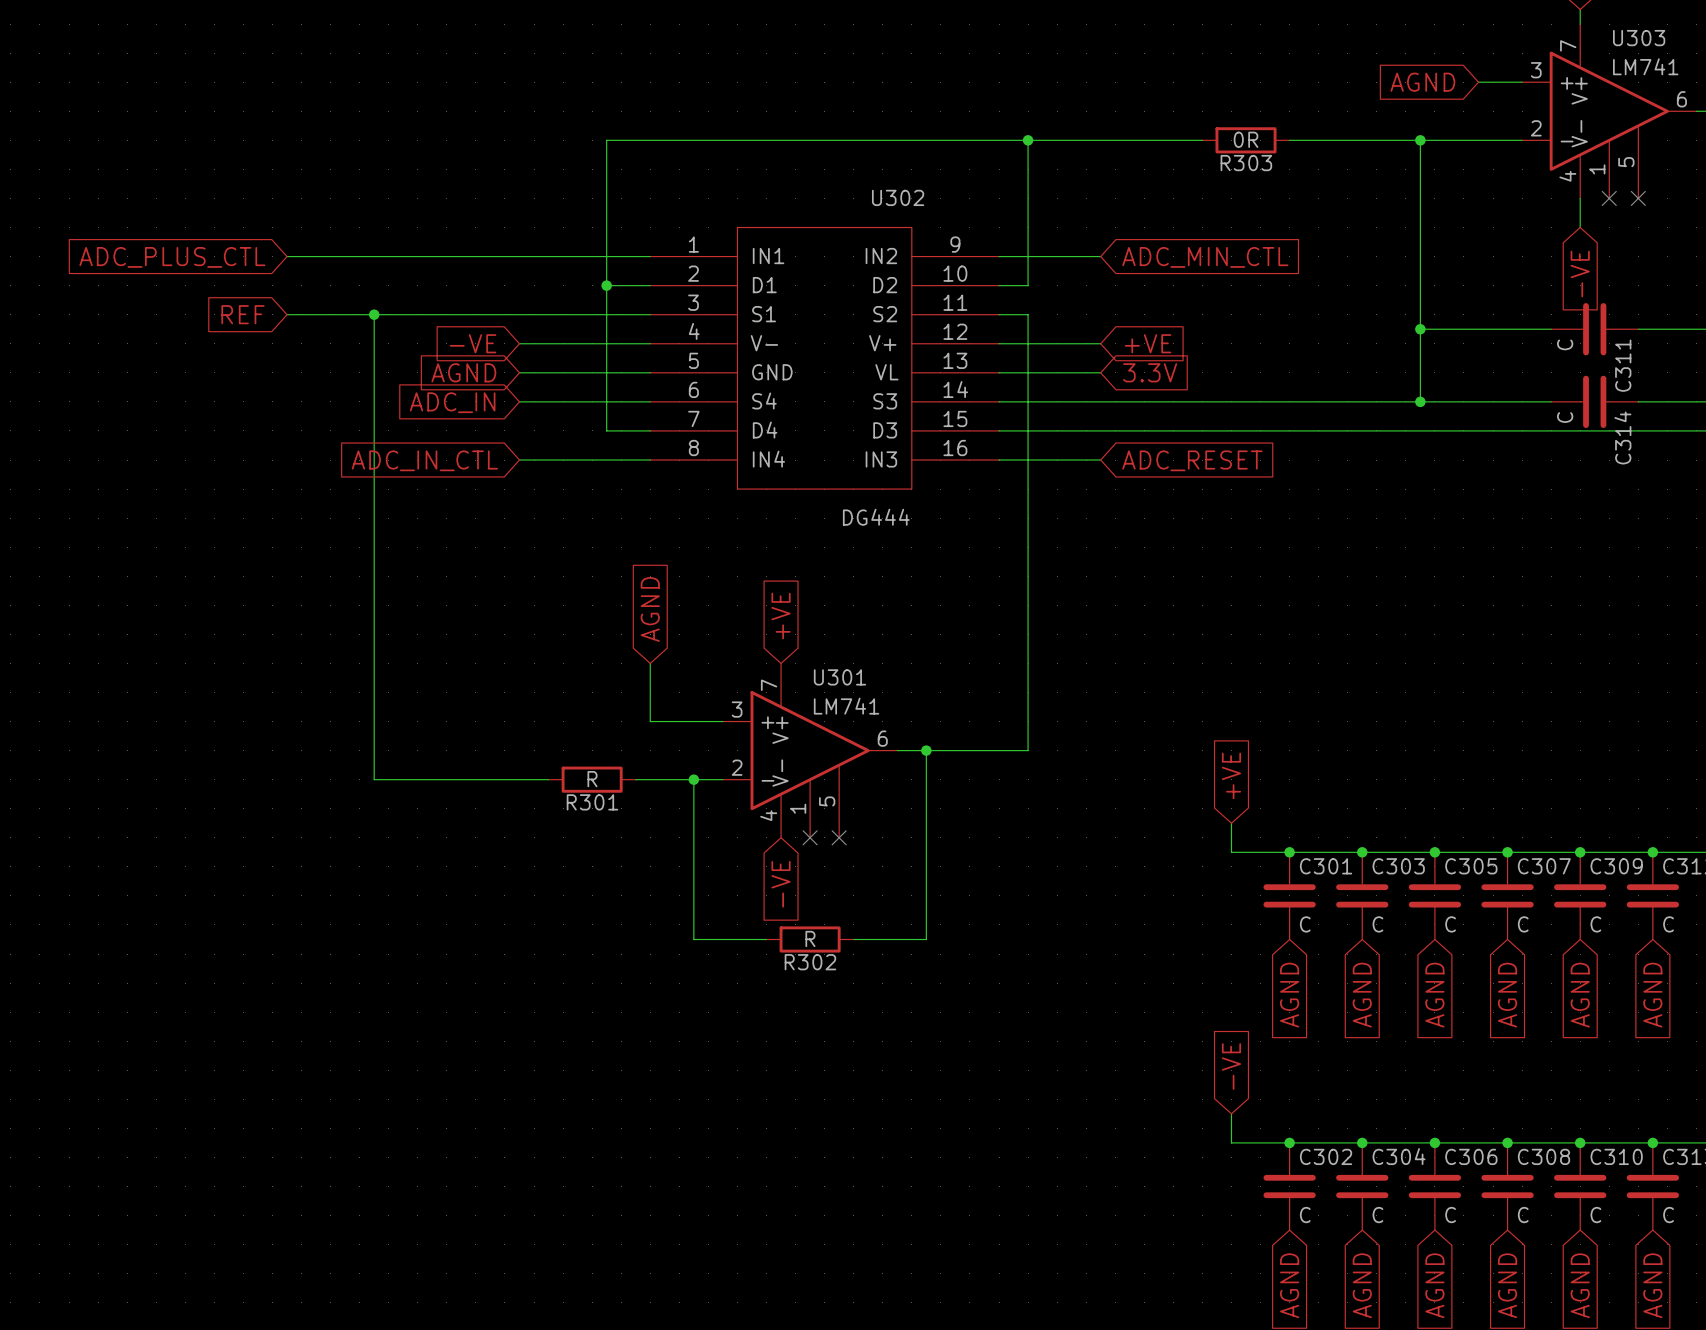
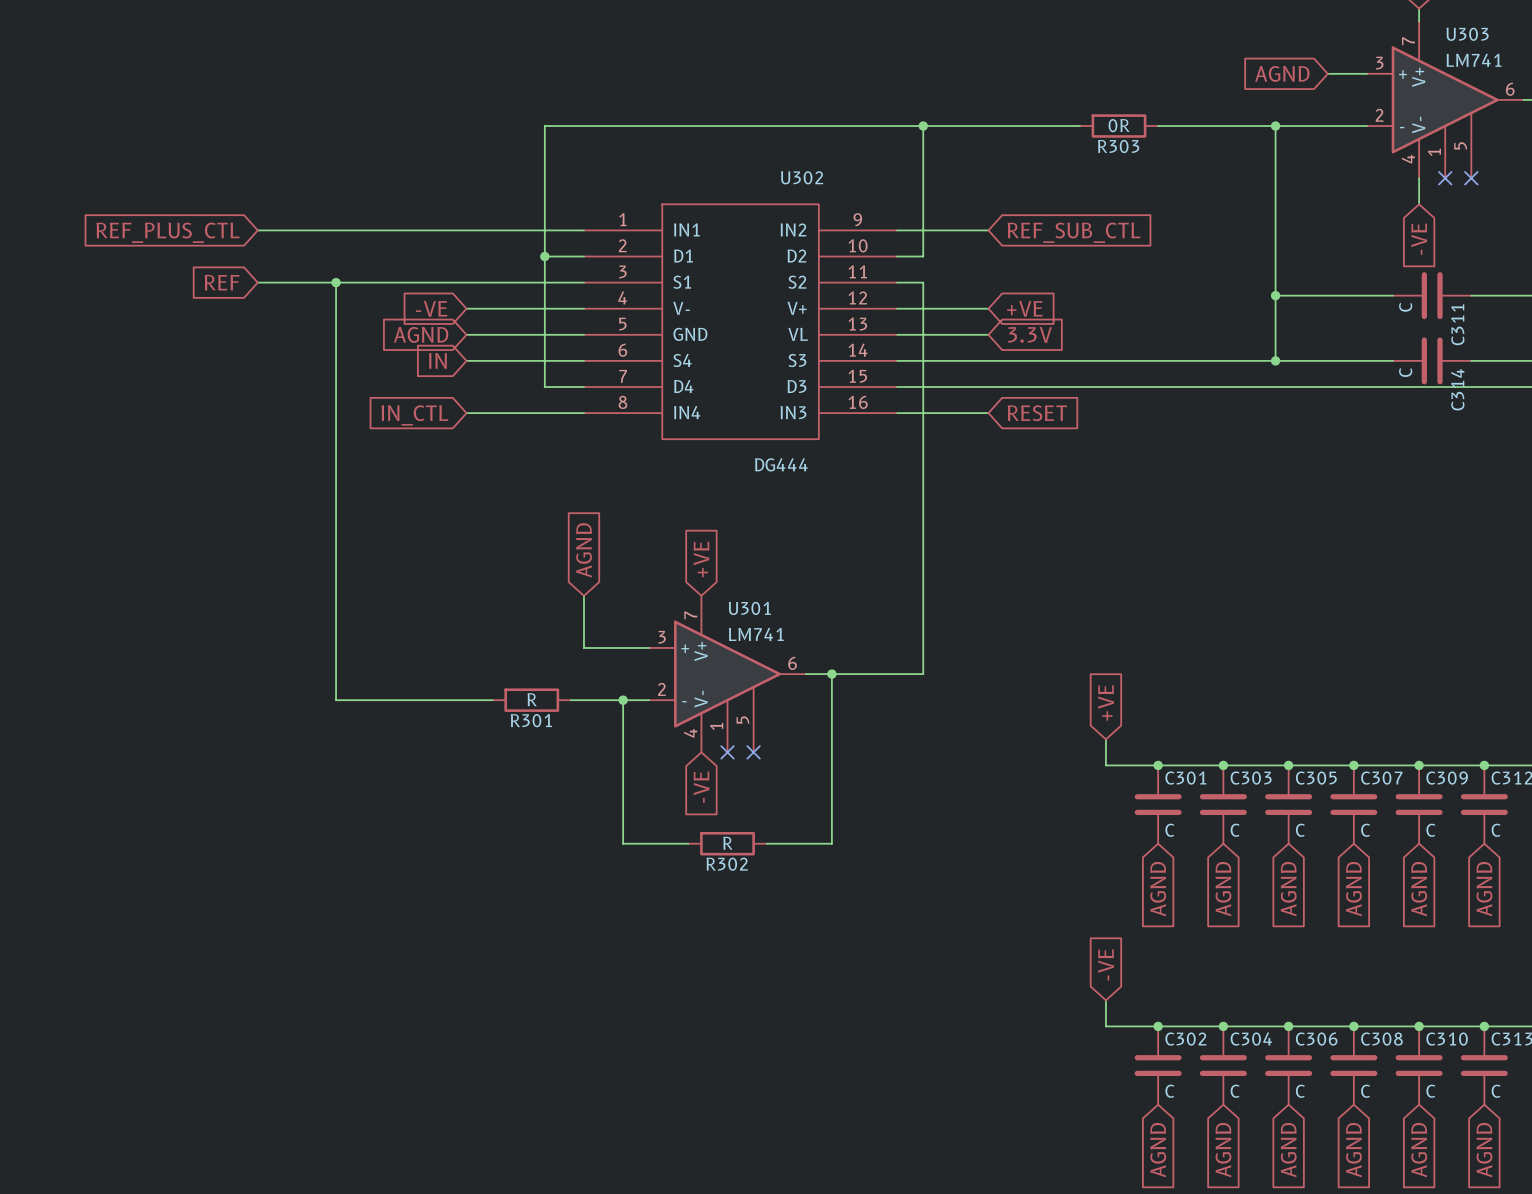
global label: ADC_PLUS_CTL (172, 257) -> REF_PLUS_CTL (167, 232)
global label: ADC_MIN_CTL (1205, 257) -> REF_SUB_CTL (1074, 232)
global label: ADC_IN (452, 402) -> IN (437, 360)
global label: ADC_IN_CTL (424, 460) -> IN_CTL (414, 415)
global label: ADC_RESET (1192, 460) -> RESET (1037, 413)

